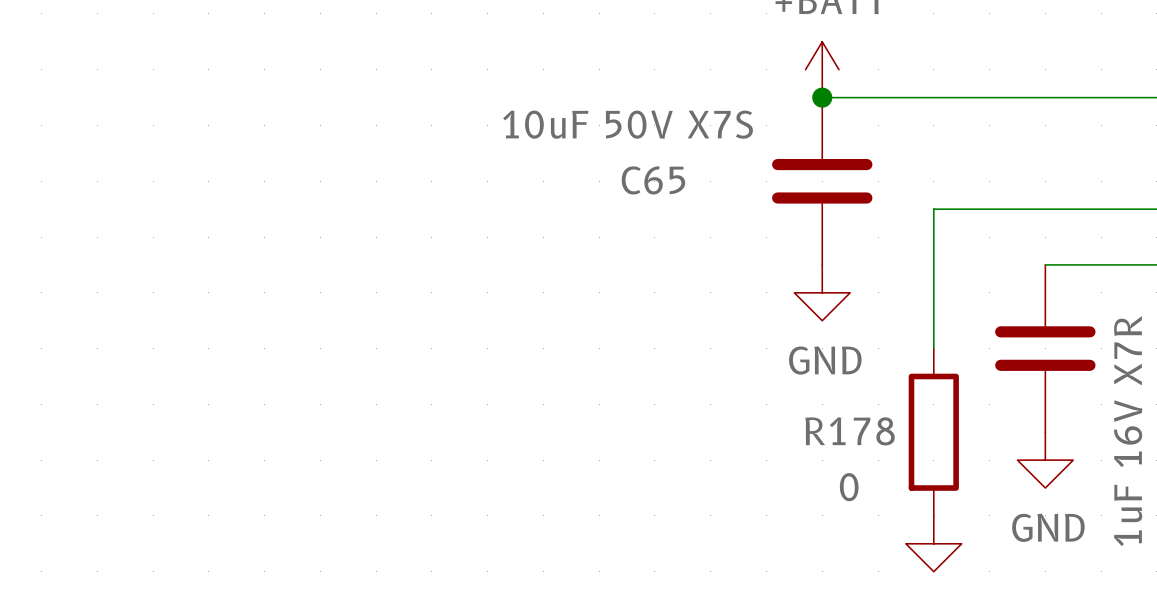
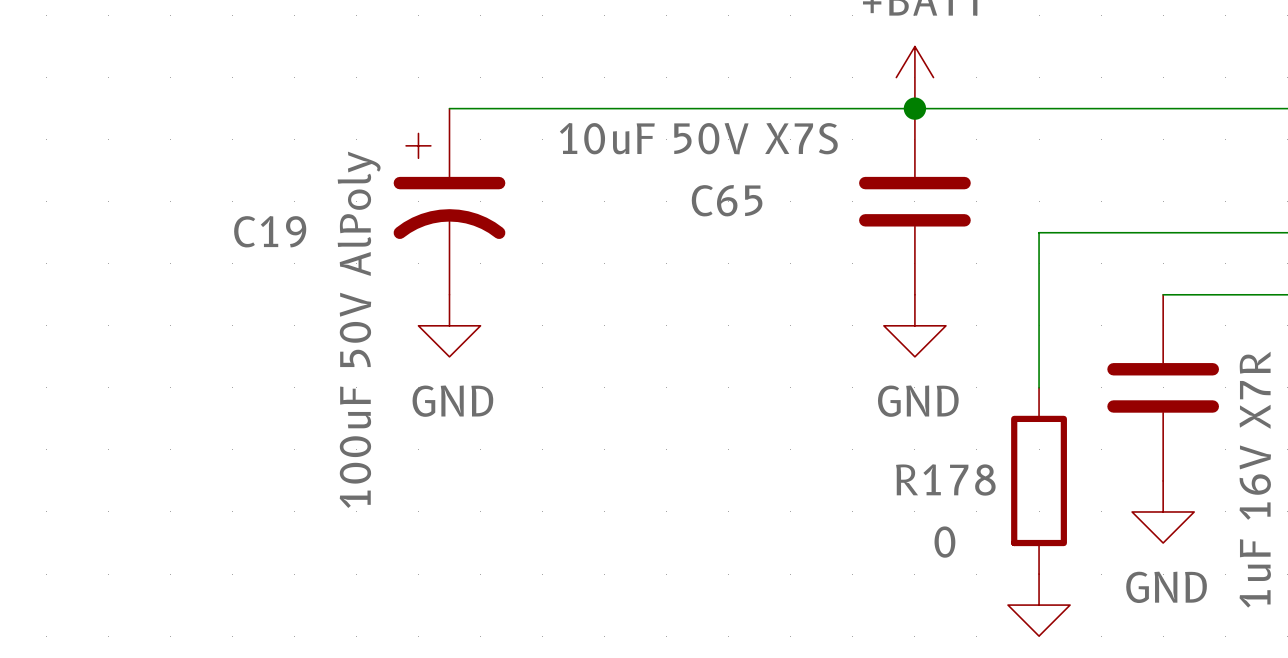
wire: none -> (449, 108) (914, 108)
C19: none -> 100uF 50V AlPoly (449, 201)
power symbol: none -> GND (449, 325)

